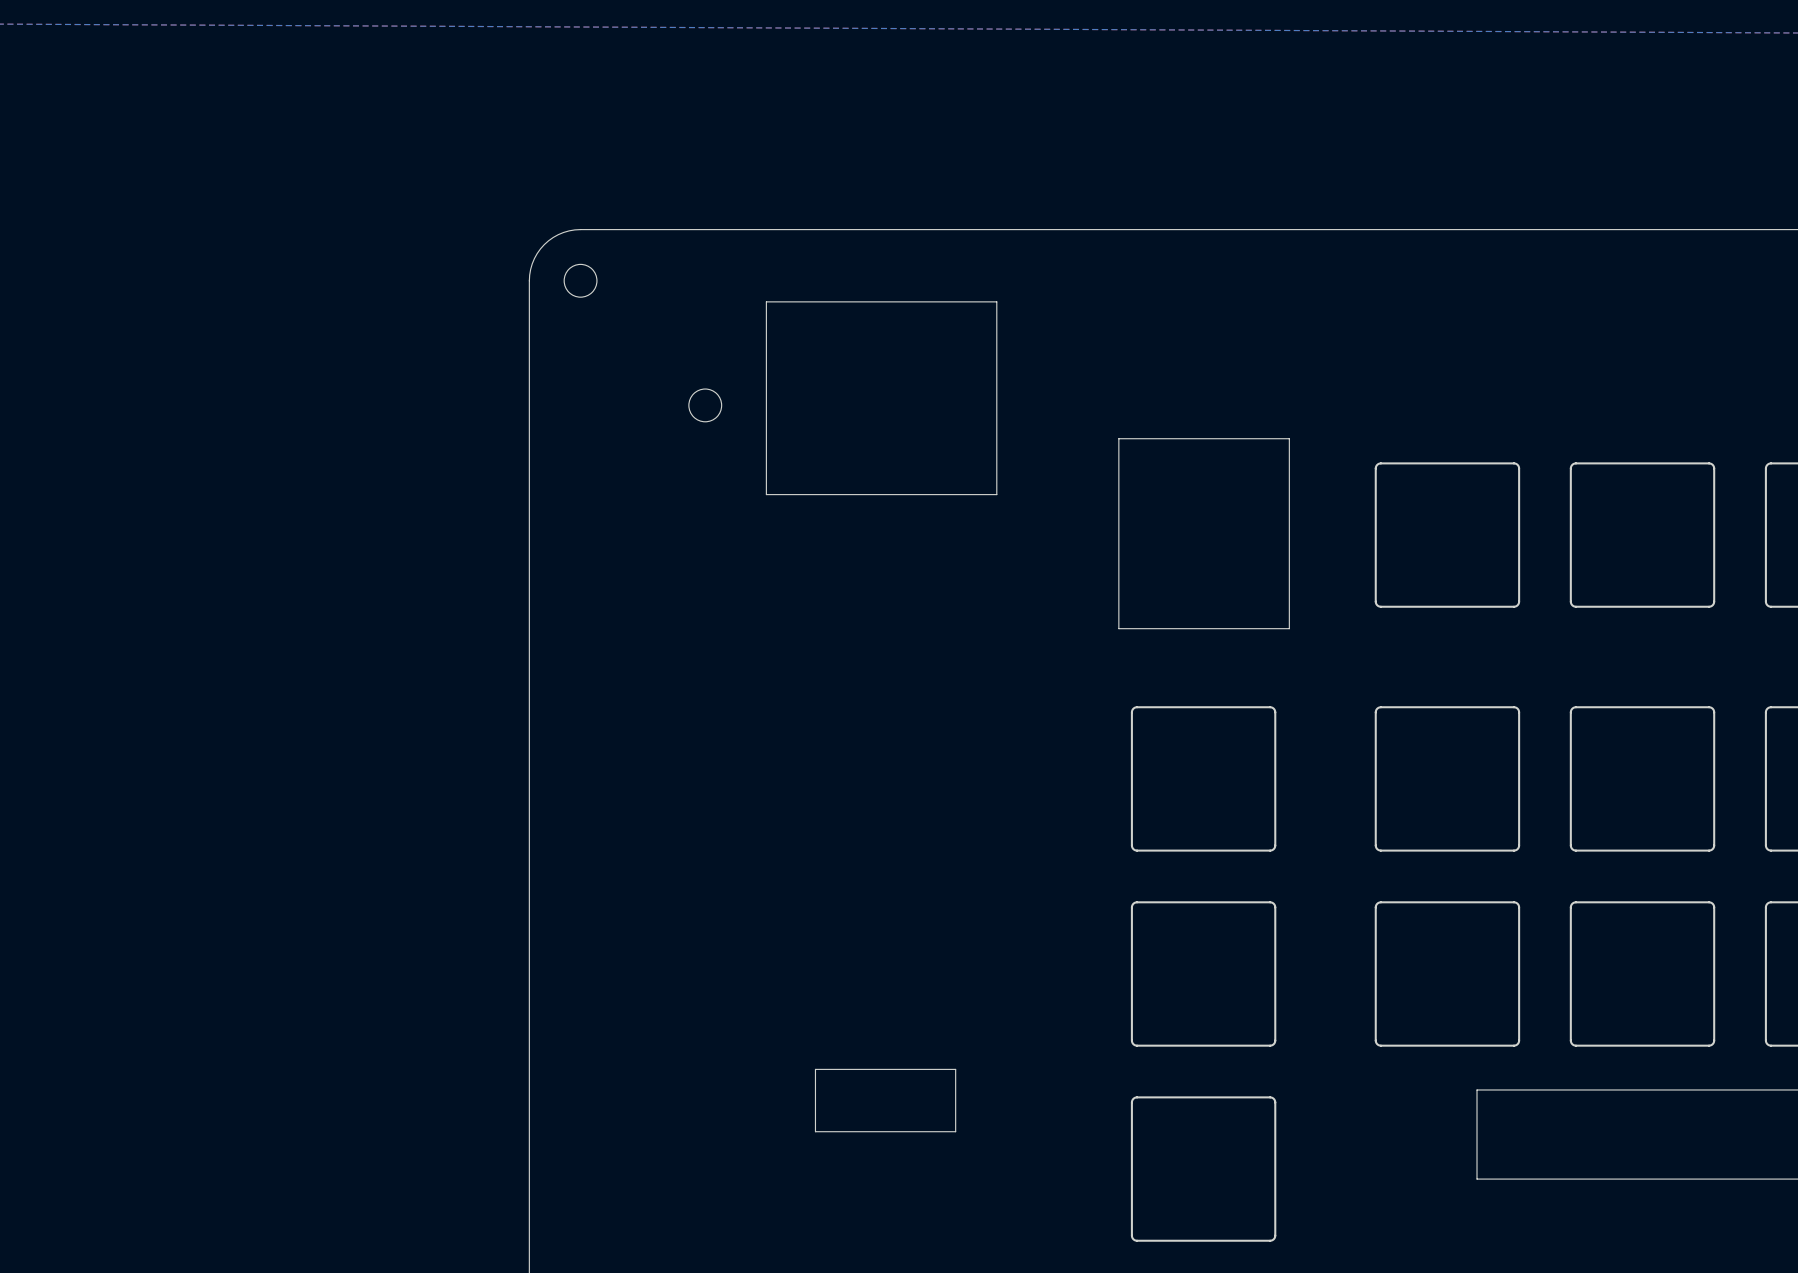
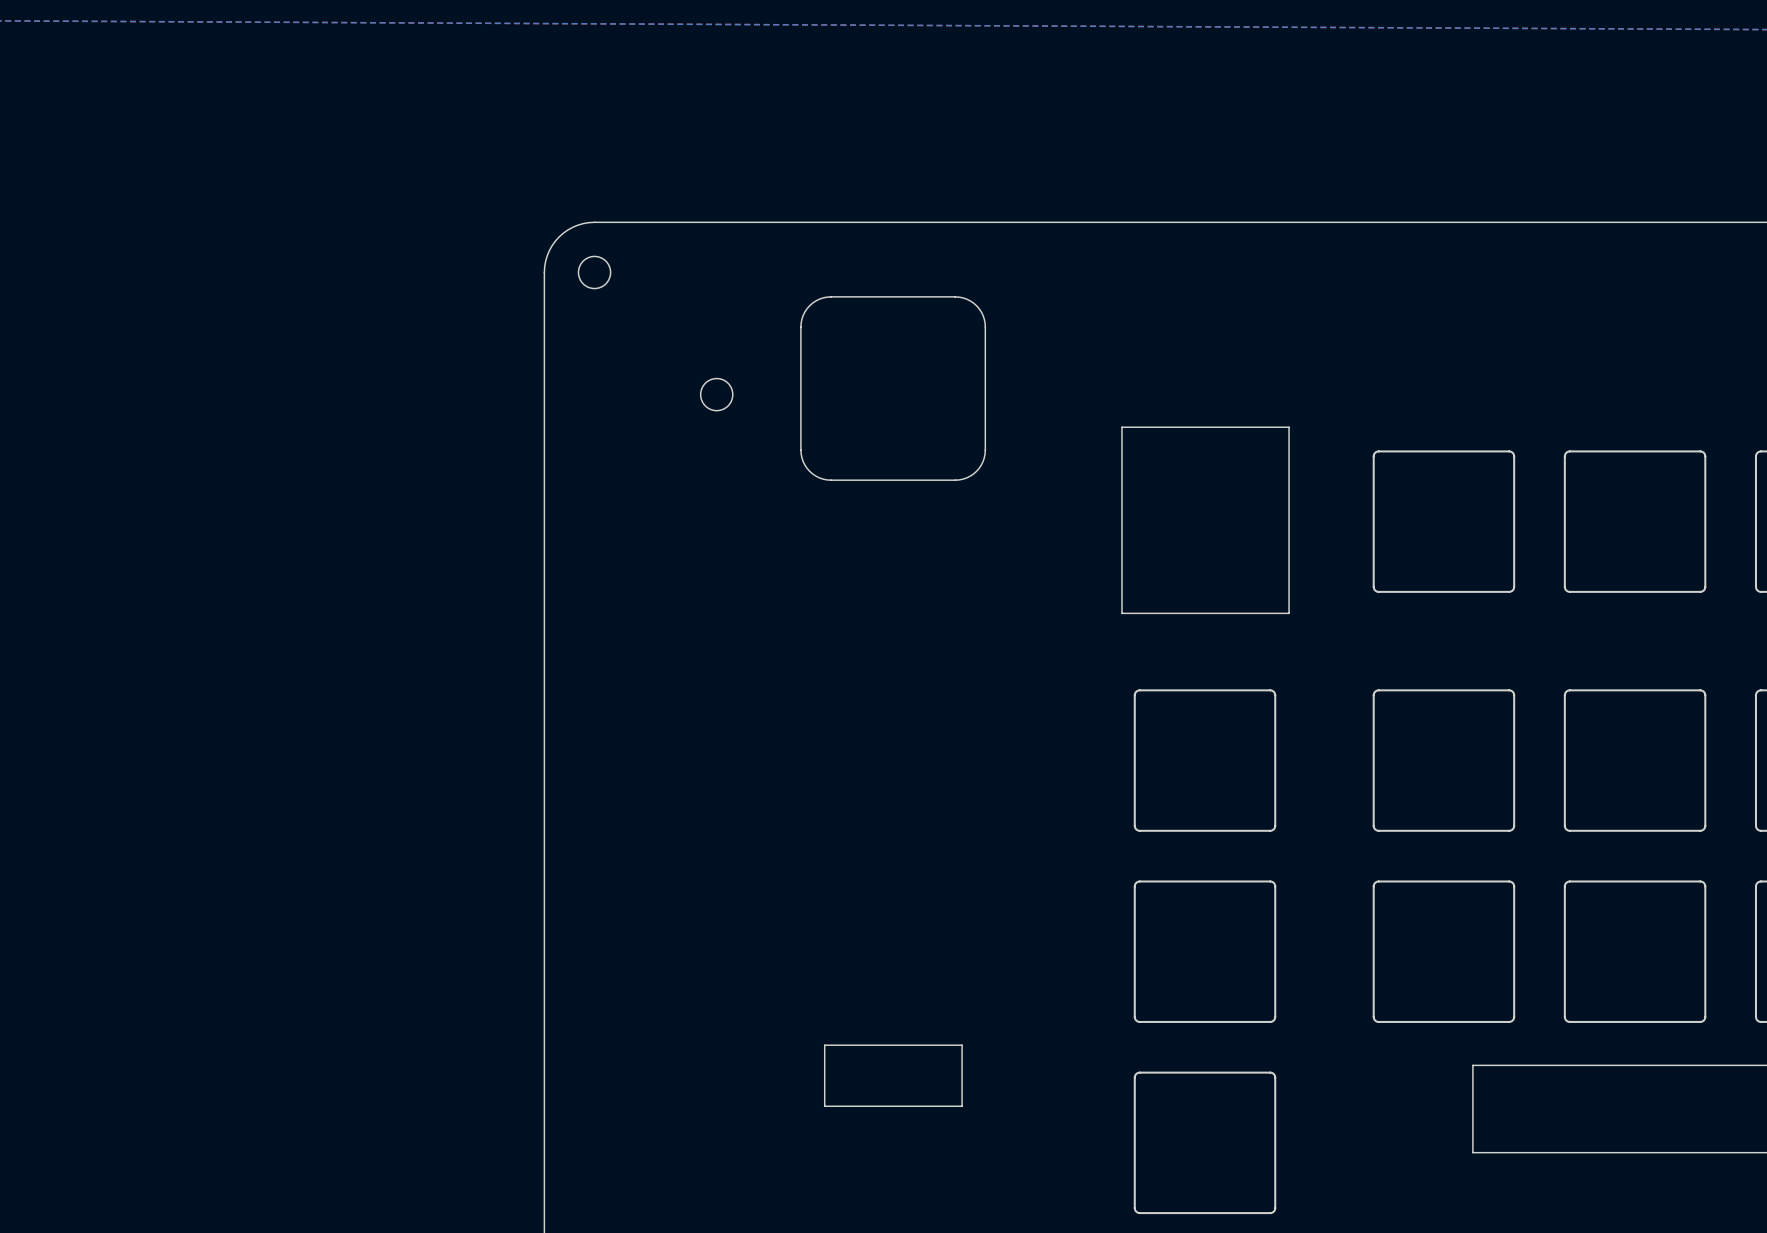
board edge: (996, 301) (766, 301) (766, 494) (996, 494) (996, 301) -> (955, 296) (966, 299) (976, 305) (983, 315) (985, 323) (985, 450) (984, 457) (979, 468) (966, 477) (955, 480) (831, 480) (823, 479) (812, 473) (803, 461) (800, 450) (800, 326) (803, 315) (807, 308) (815, 300) (827, 297) (955, 296)

